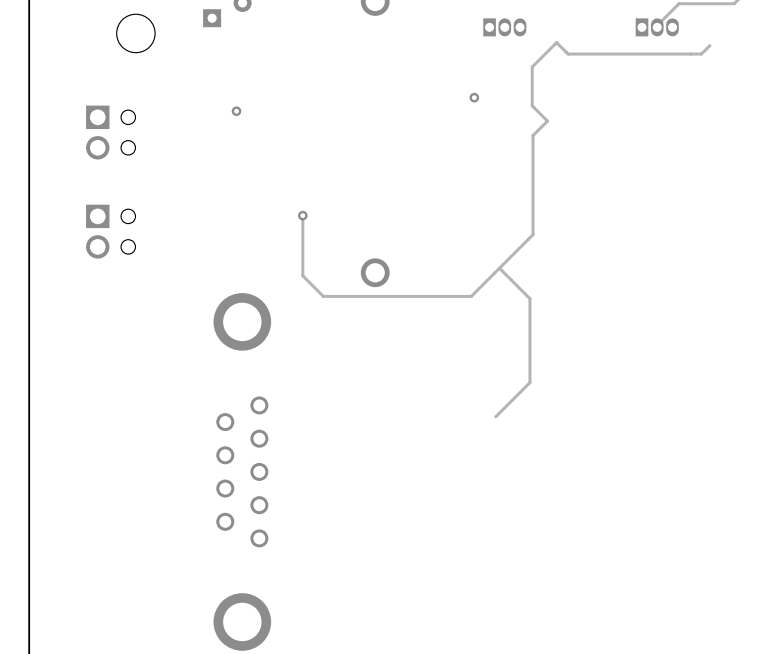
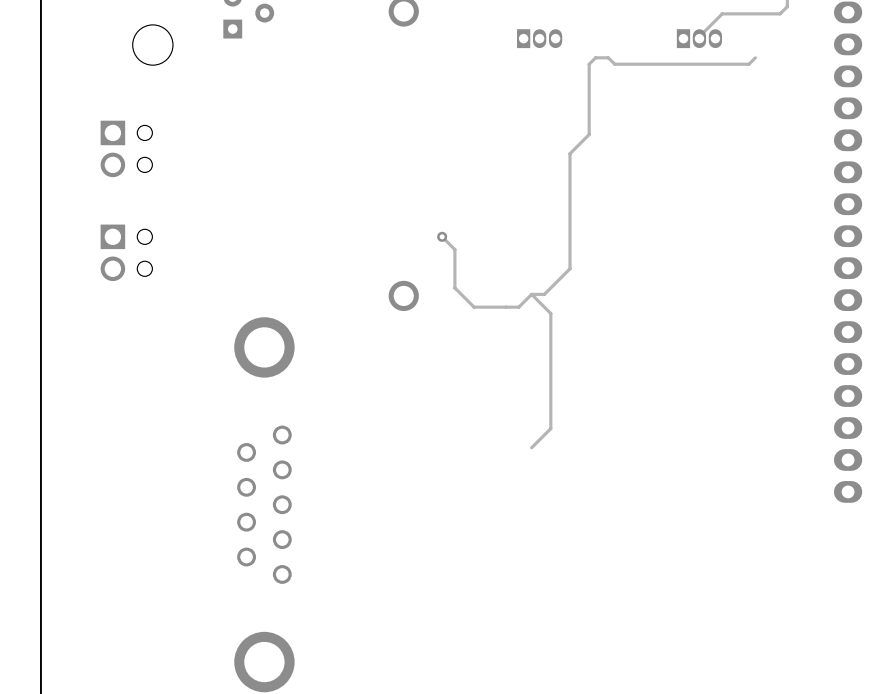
track: (709, 45) (701, 54) (568, 54) (556, 42) (532, 67) (532, 105) (547, 121) (533, 135) (533, 234) (471, 296) (323, 296) (302, 275) (302, 215) -> none
track: none -> (755, 57) (749, 64) (614, 64) (608, 57) (595, 57) (589, 64) (589, 134) (569, 153) (569, 268) (544, 294) (531, 294)
via: (474, 97) -> none
via: (236, 111) -> none
via: (302, 215) -> none
track: none -> (442, 236) (454, 249) (454, 287) (474, 307) (518, 307) (531, 294)
via: none -> (442, 236)
track: (499, 268) (529, 298) (529, 382) (495, 416) -> none
track: none -> (531, 294) (550, 313) (550, 428) (531, 447)

